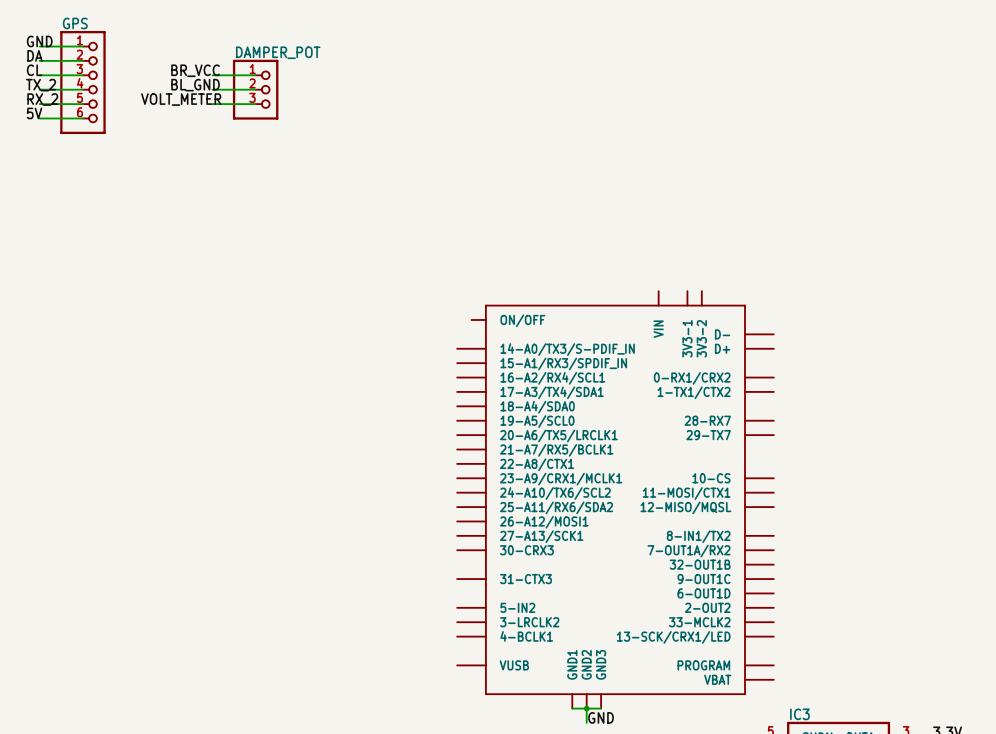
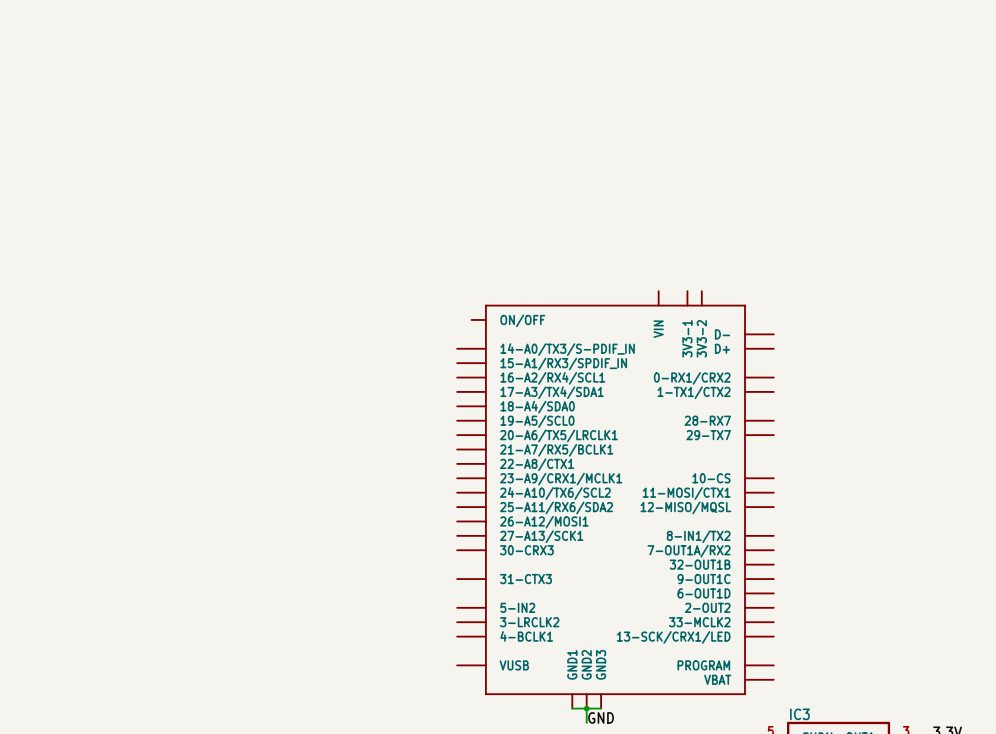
label: GND (39, 41) -> none
wire: (39, 46) (82, 46) -> none
label: DA (34, 55) -> none
wire: (39, 60) (82, 60) -> none
label: CL (34, 70) -> none
label: BR_VCC (195, 70) -> none
wire: (39, 75) (82, 75) -> none
wire: (212, 75) (255, 75) -> none
GPS: (82, 82) -> none
label: TX_2 (41, 85) -> none
label: BL_GND (195, 85) -> none
wire: (39, 89) (82, 89) -> none
wire: (212, 89) (255, 89) -> none
DAMPER_POT: (255, 89) -> none
label: RX_2 (42, 99) -> none
label: VOLT_METER (181, 99) -> none
wire: (39, 104) (82, 104) -> none
wire: (212, 104) (255, 104) -> none
label: 5V (34, 113) -> none
wire: (39, 118) (82, 118) -> none

